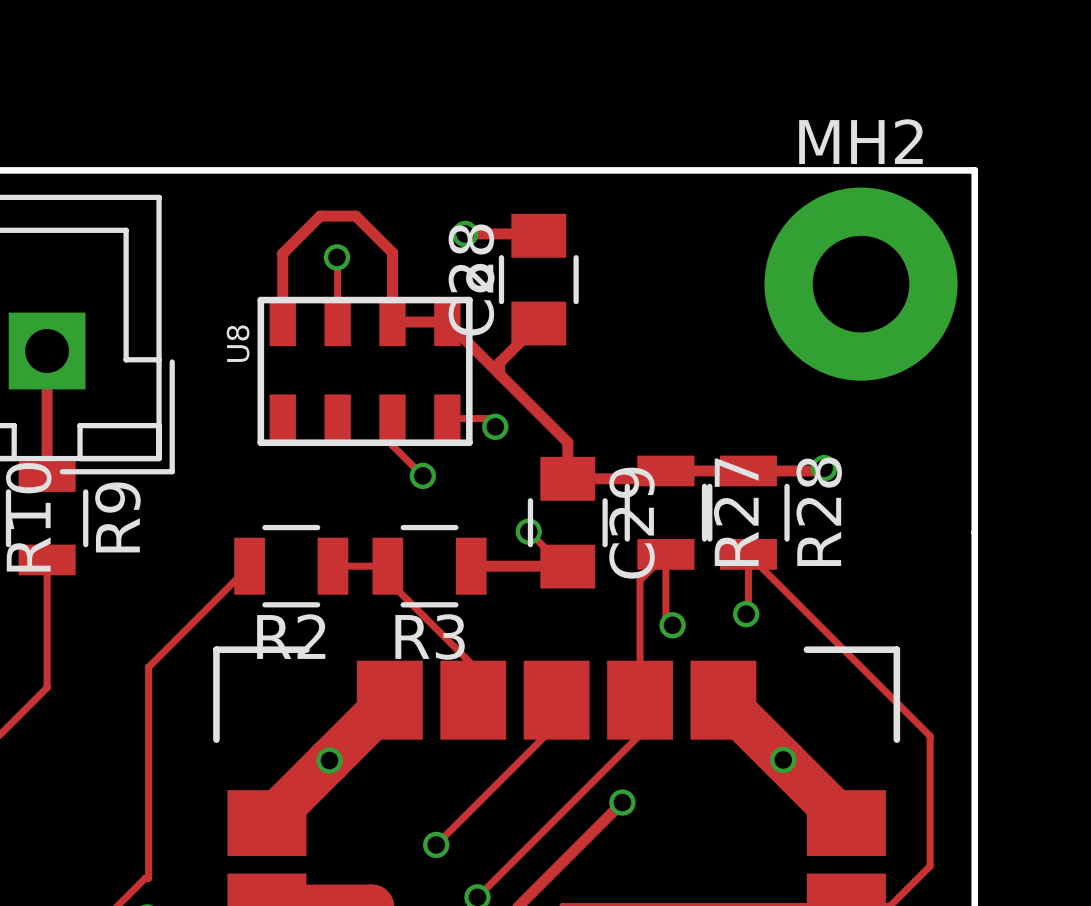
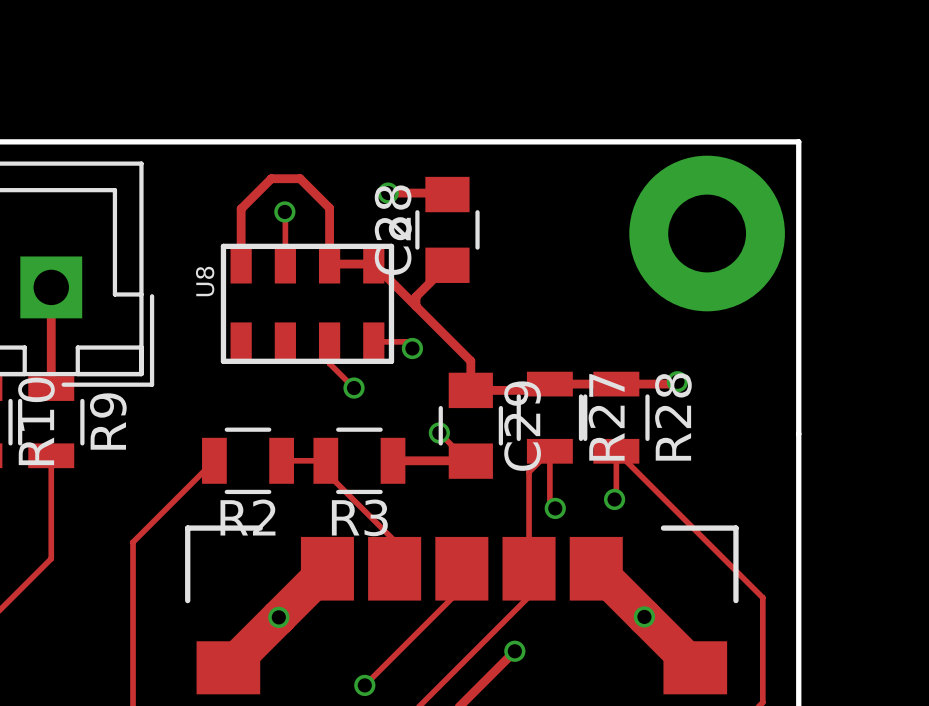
MH2 name: MH2 (860, 141) -> none

